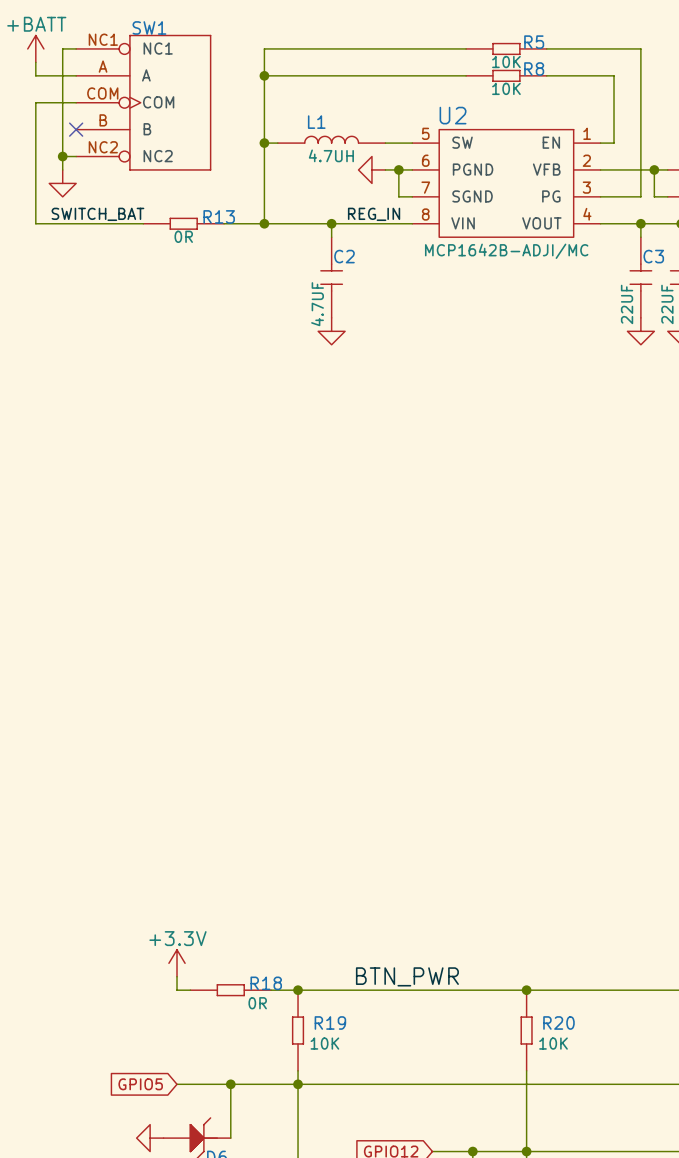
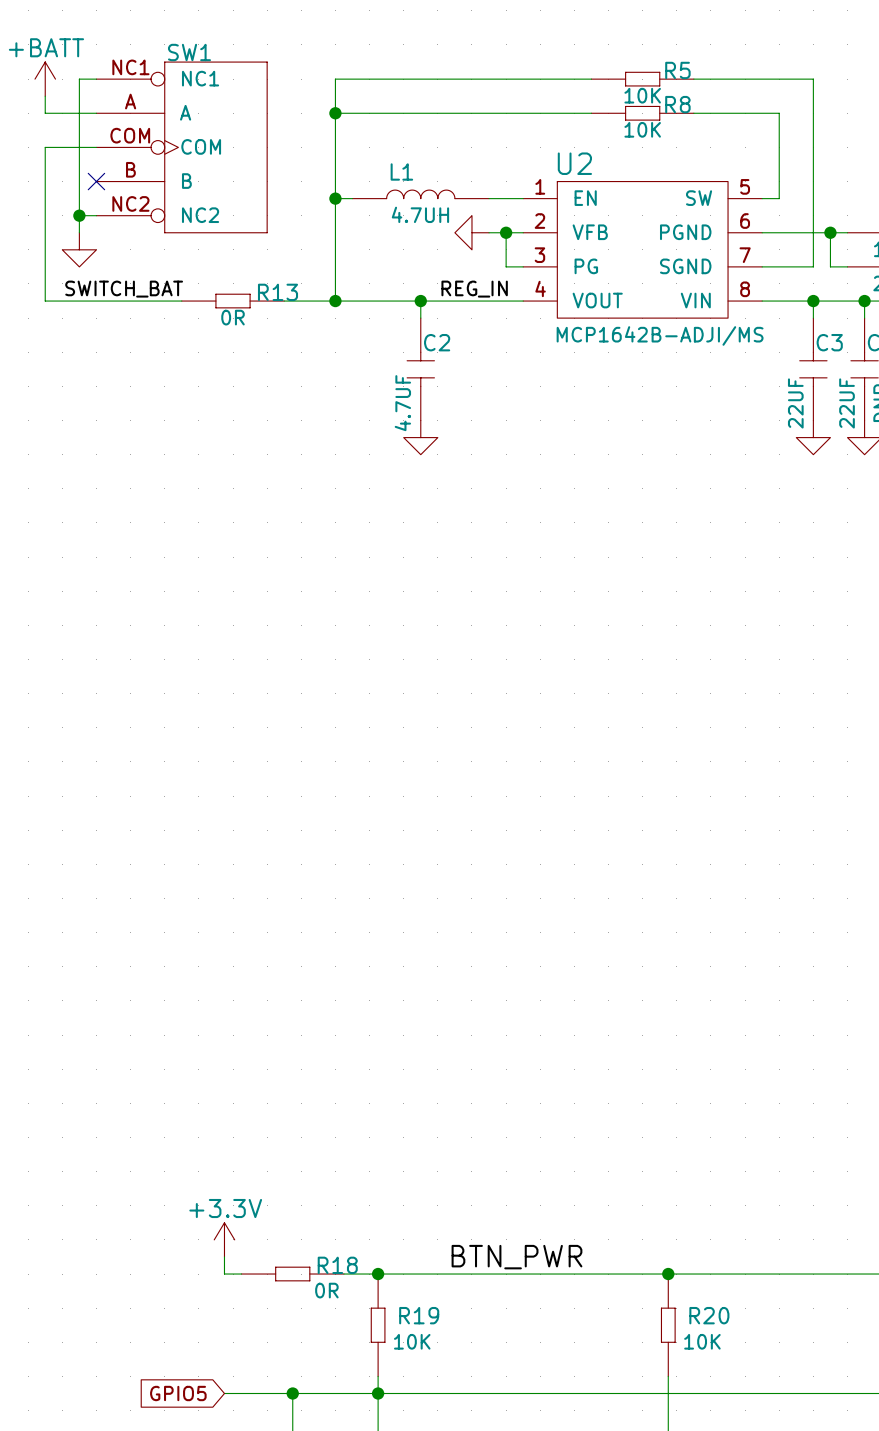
U2 flip: as is (506, 183) -> left-right (642, 249)
U2 text: MCP1642B-ADJI/MC (506, 251) -> MCP1642B-ADJI/MS (660, 335)

